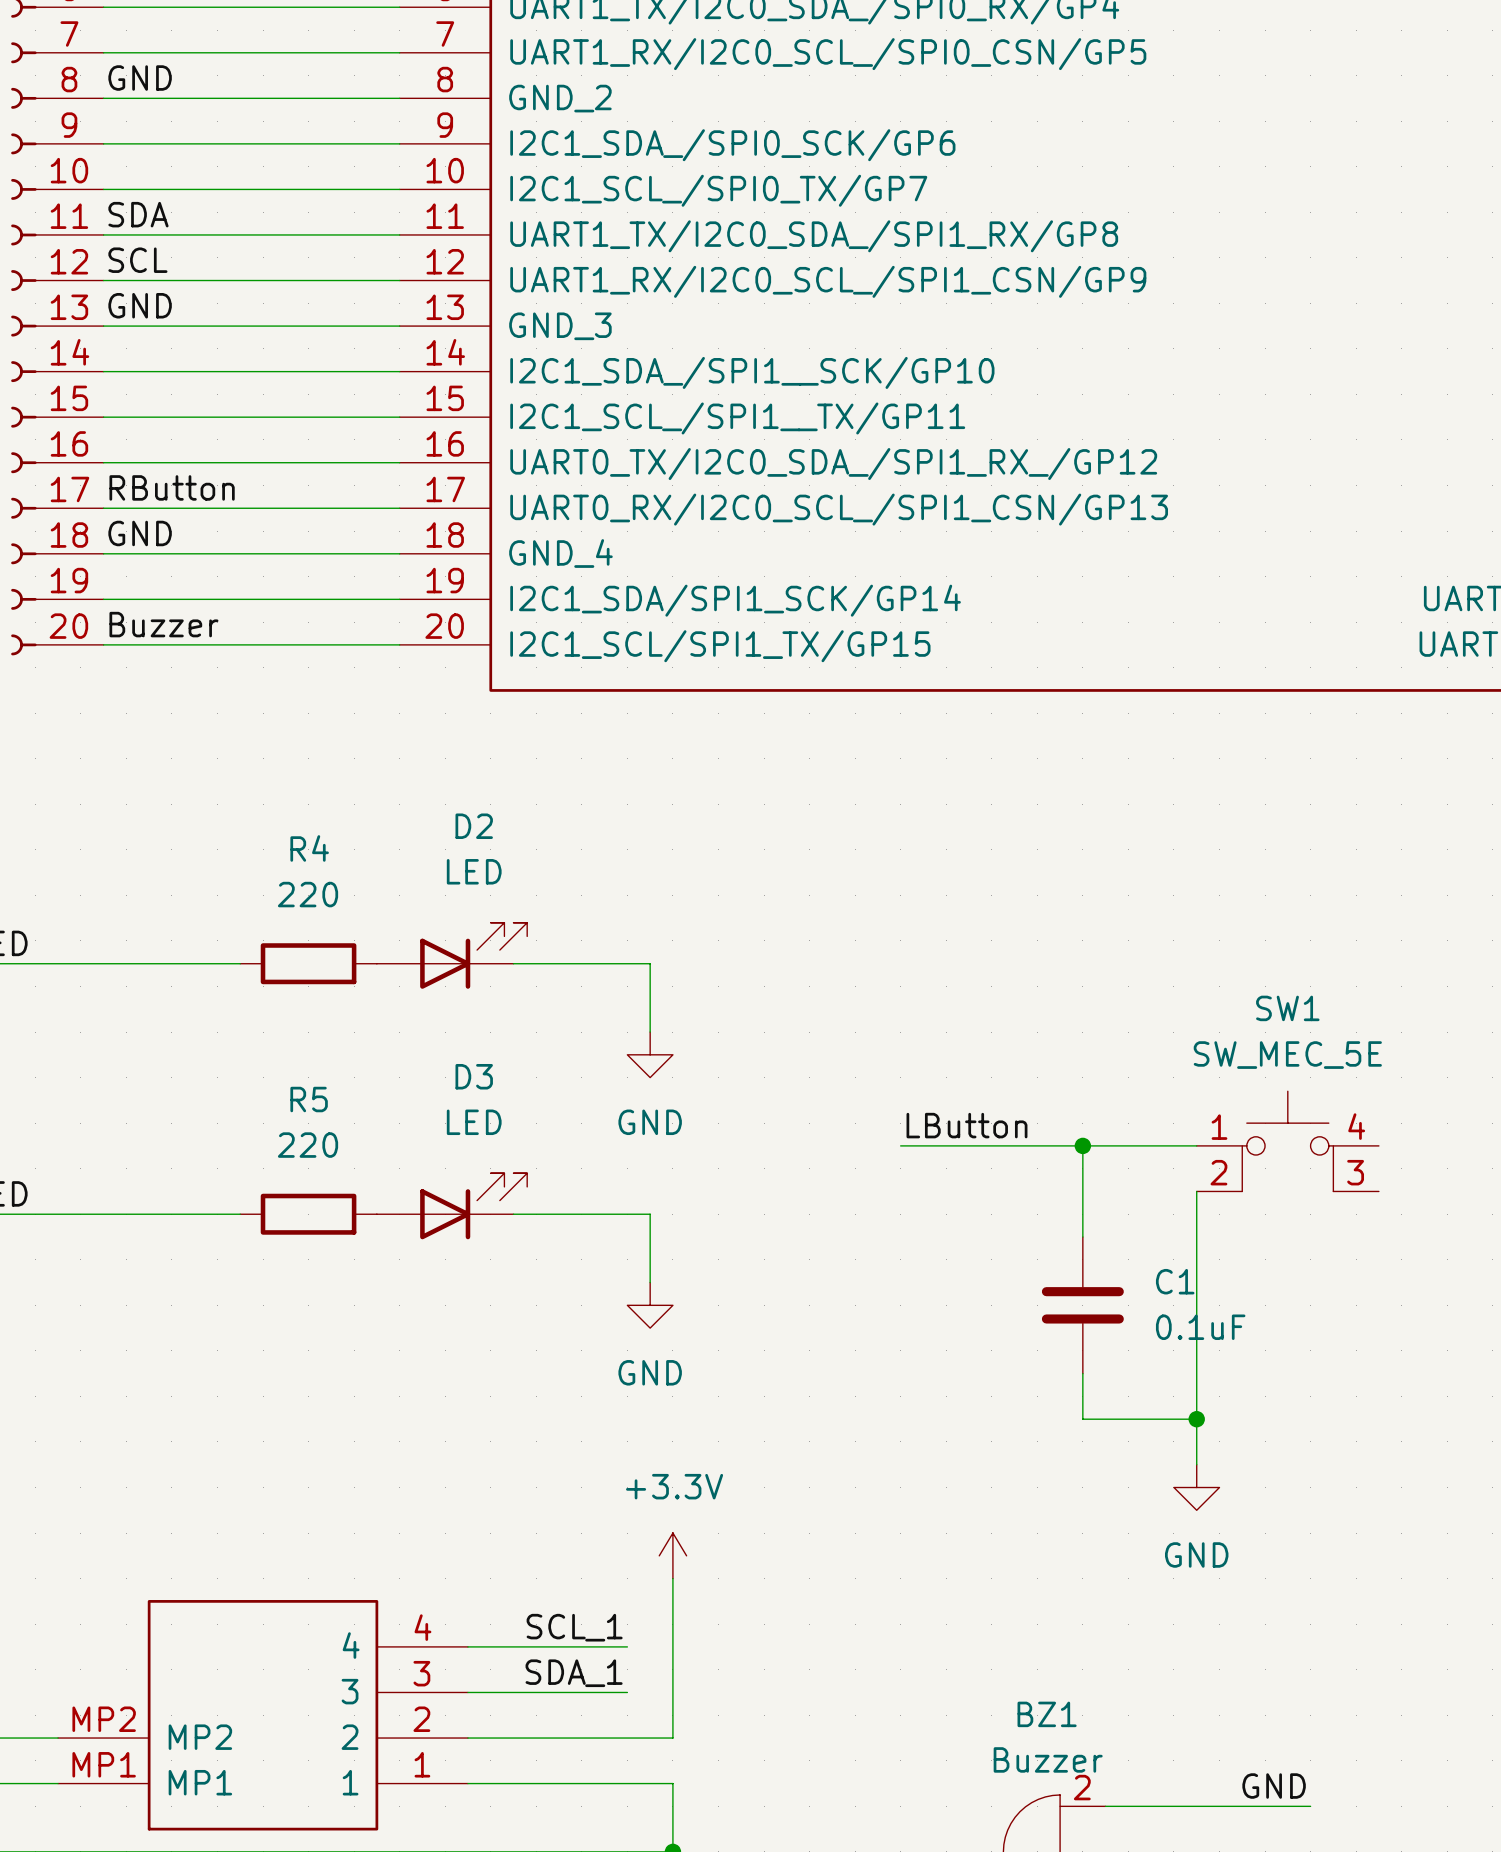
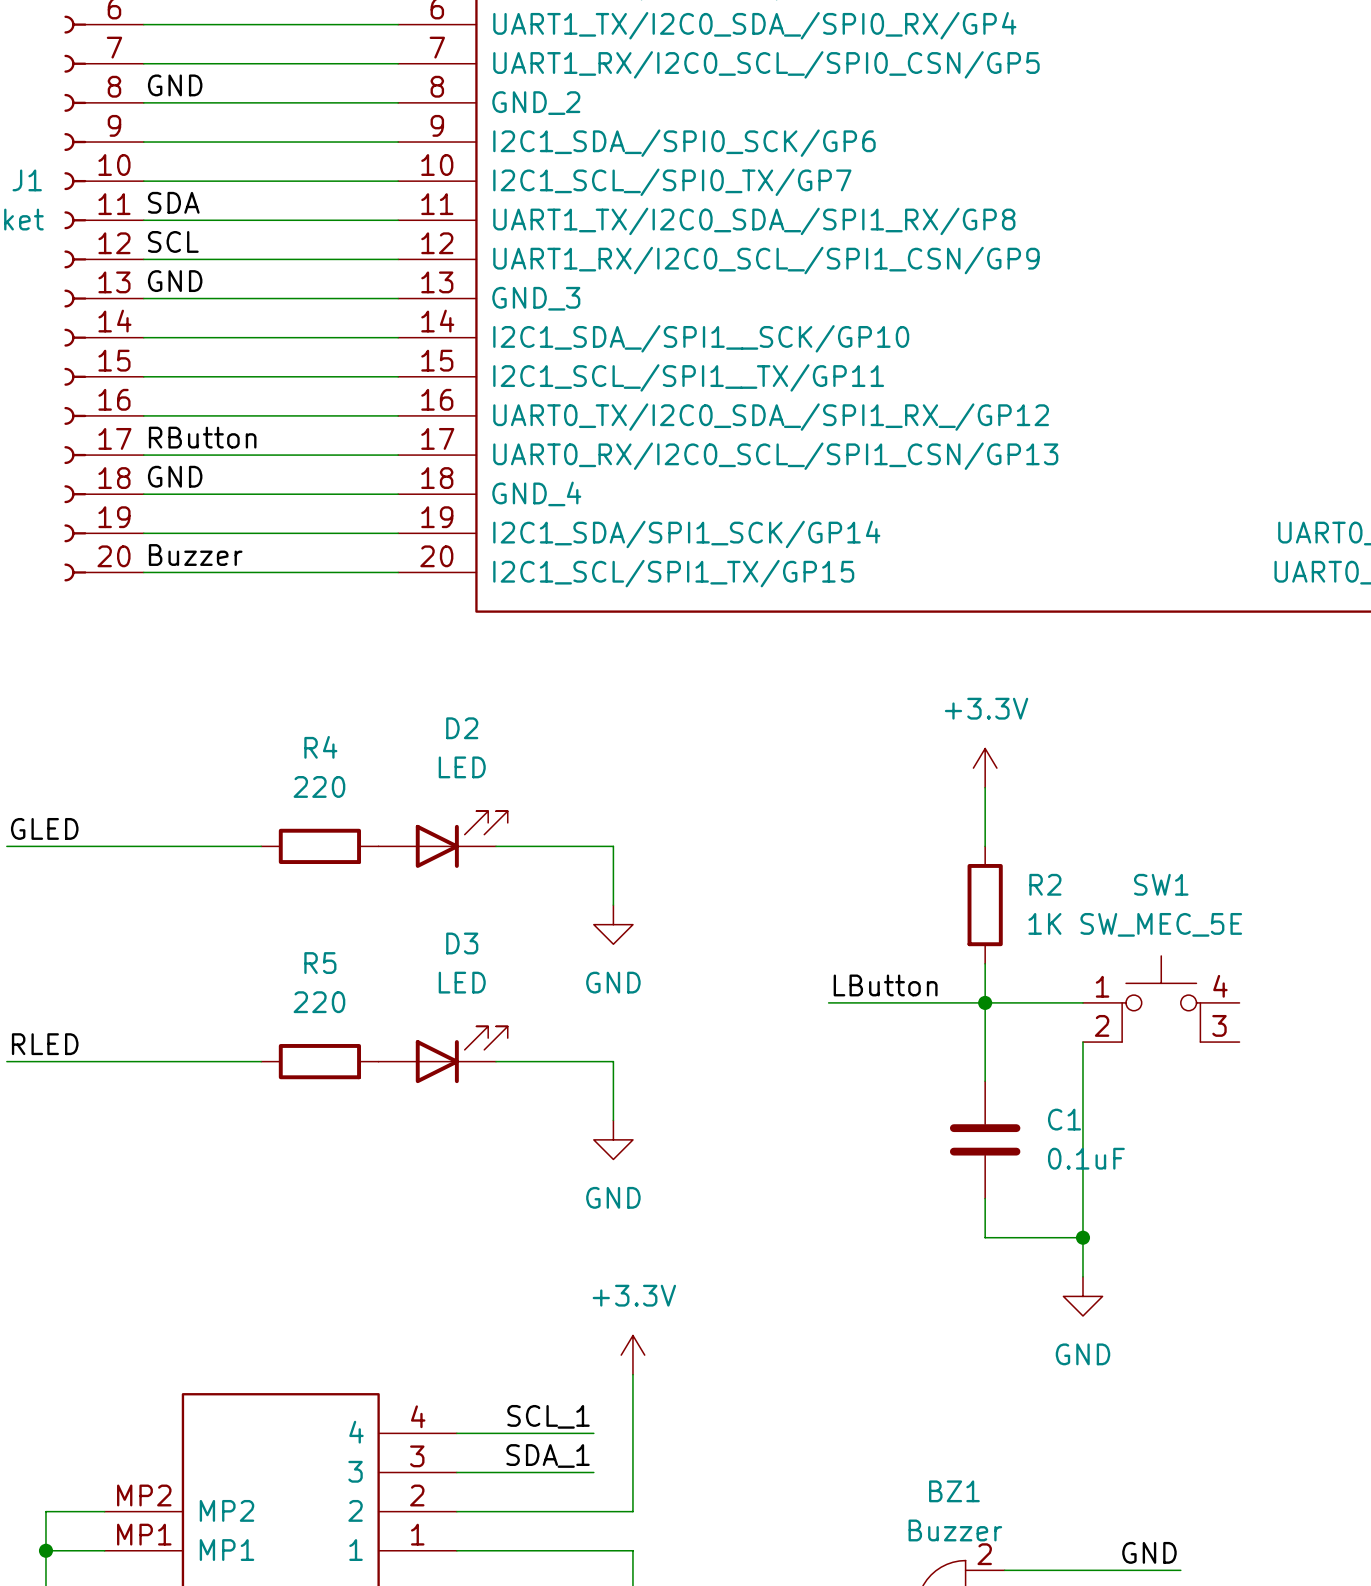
power symbol: none -> +3.3V (985, 768)
wire: none -> (985, 787) (985, 846)
R2: none -> 1K (985, 905)
wire: none -> (985, 963) (985, 1002)

